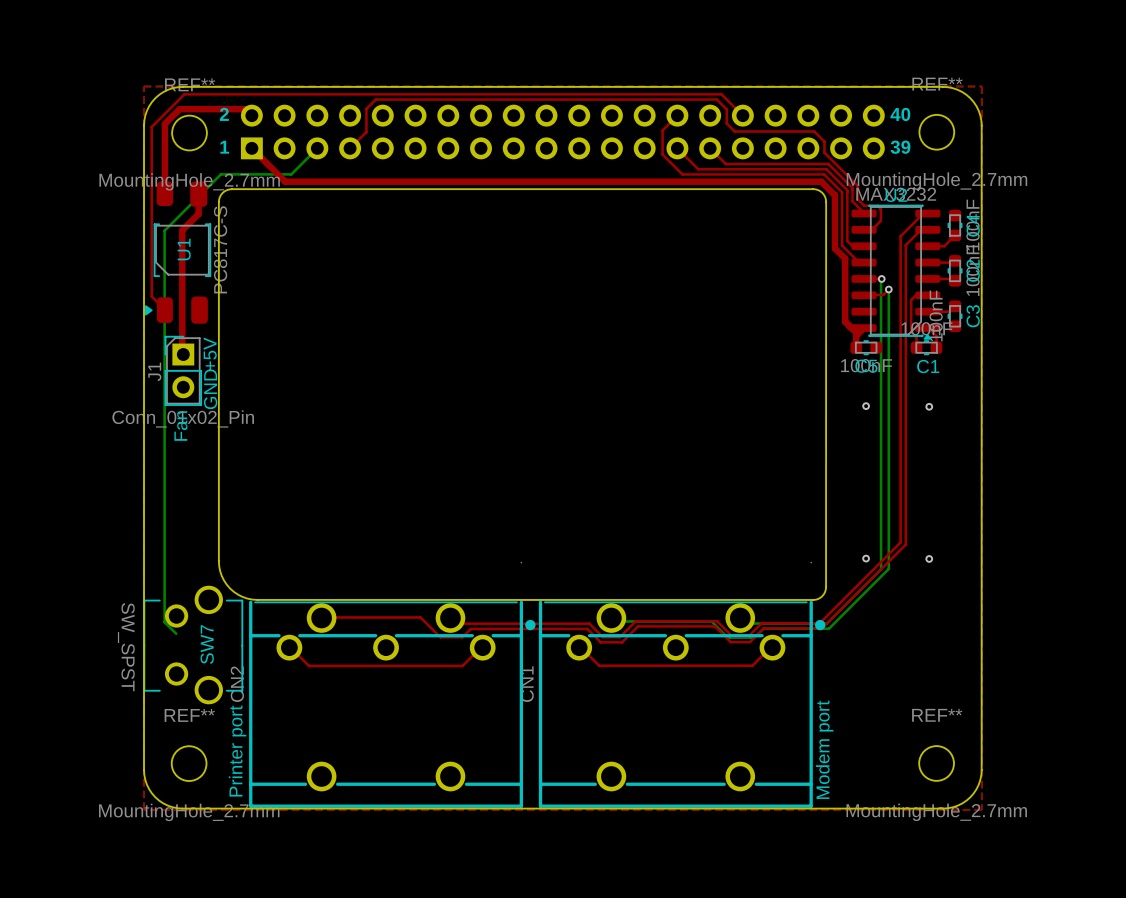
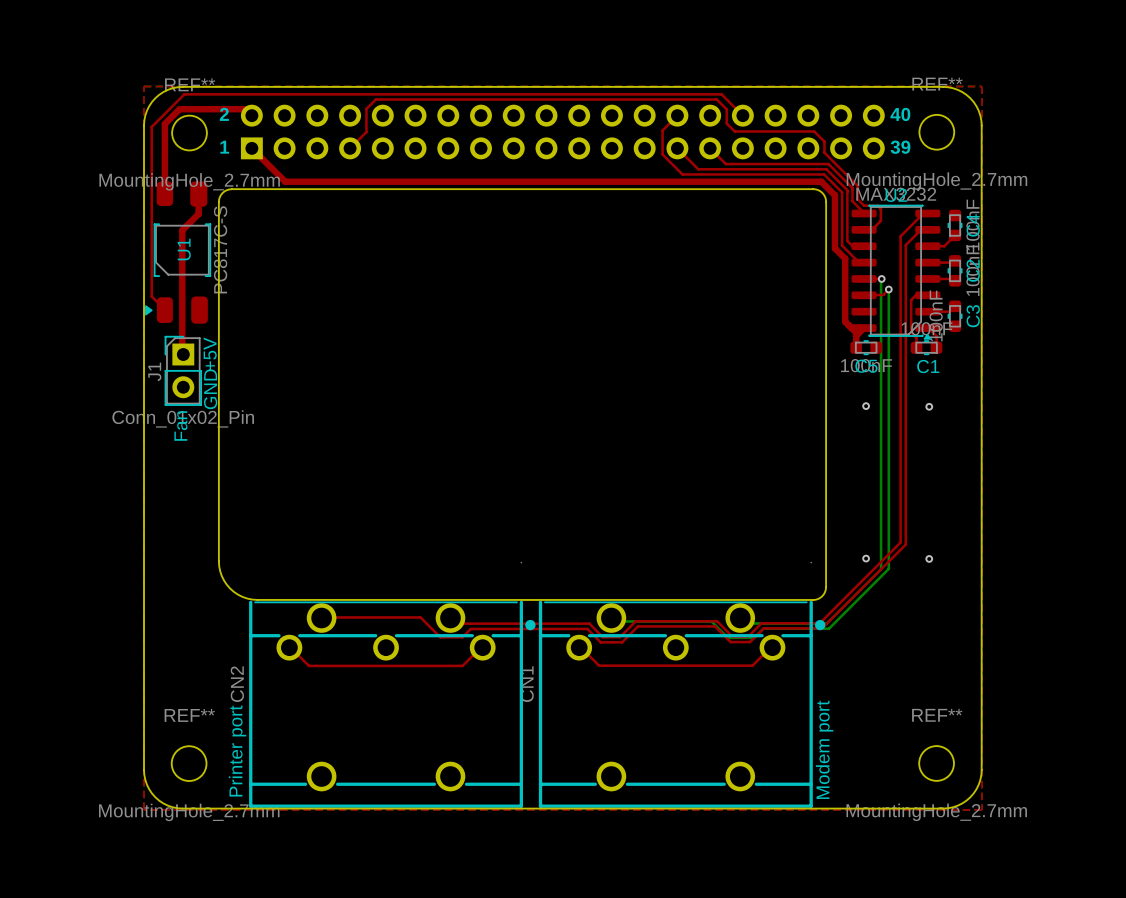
bottom track: (317, 148) (291, 174) (220, 174) (164, 230) (164, 622) (176, 633) -> none
SW7: SW_SPST (193, 645) -> none

